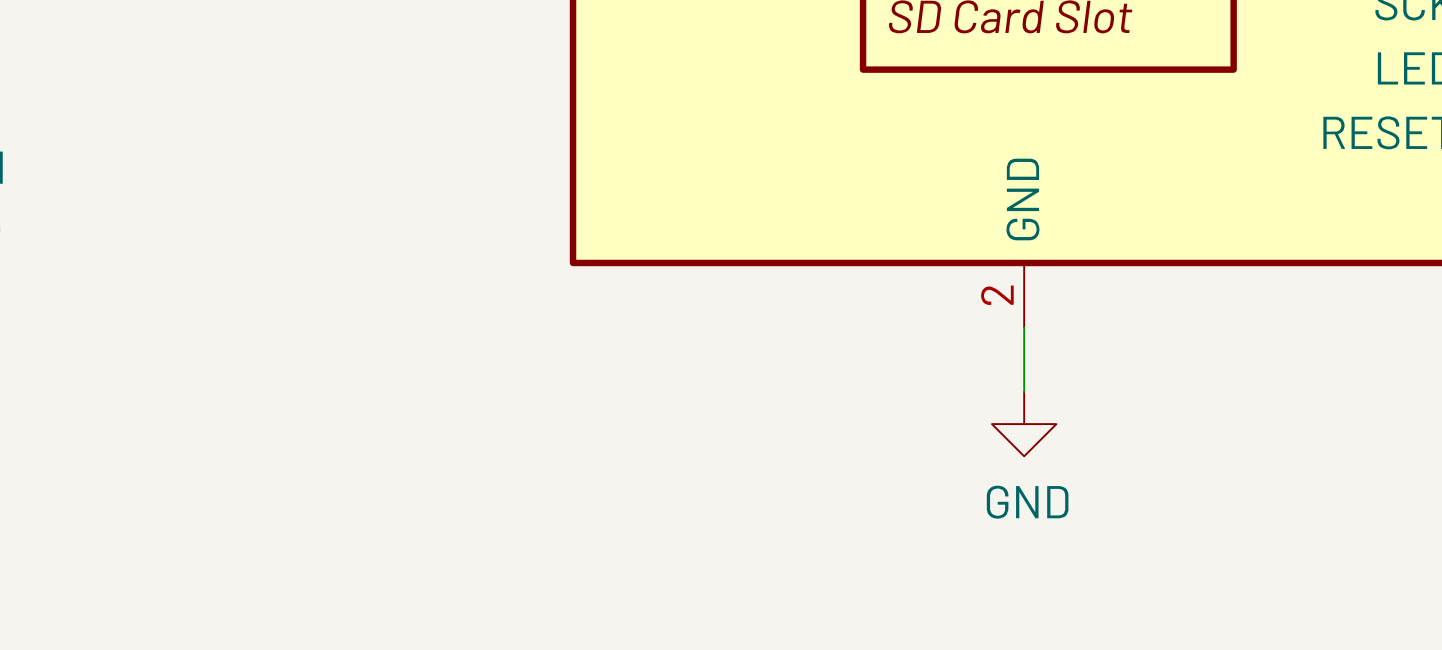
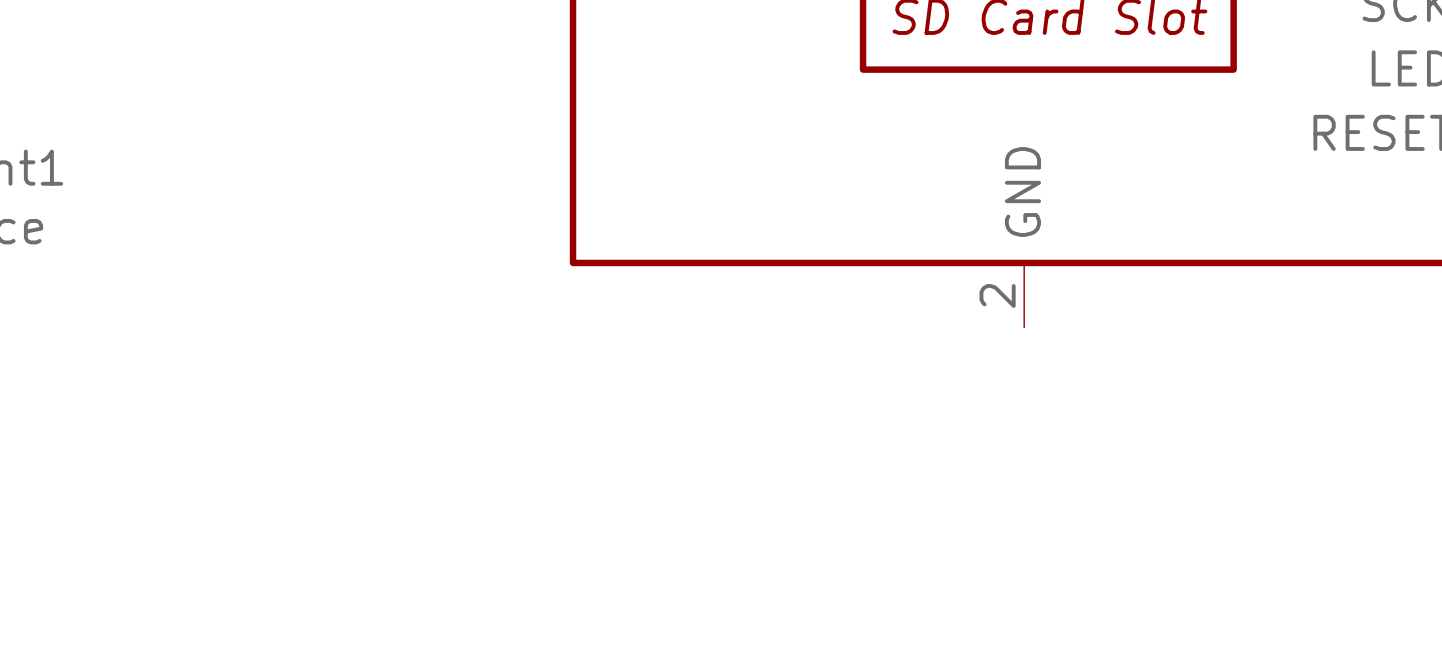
wire: (1024, 327) (1024, 391) -> none
power symbol: GND (1024, 424) -> none

